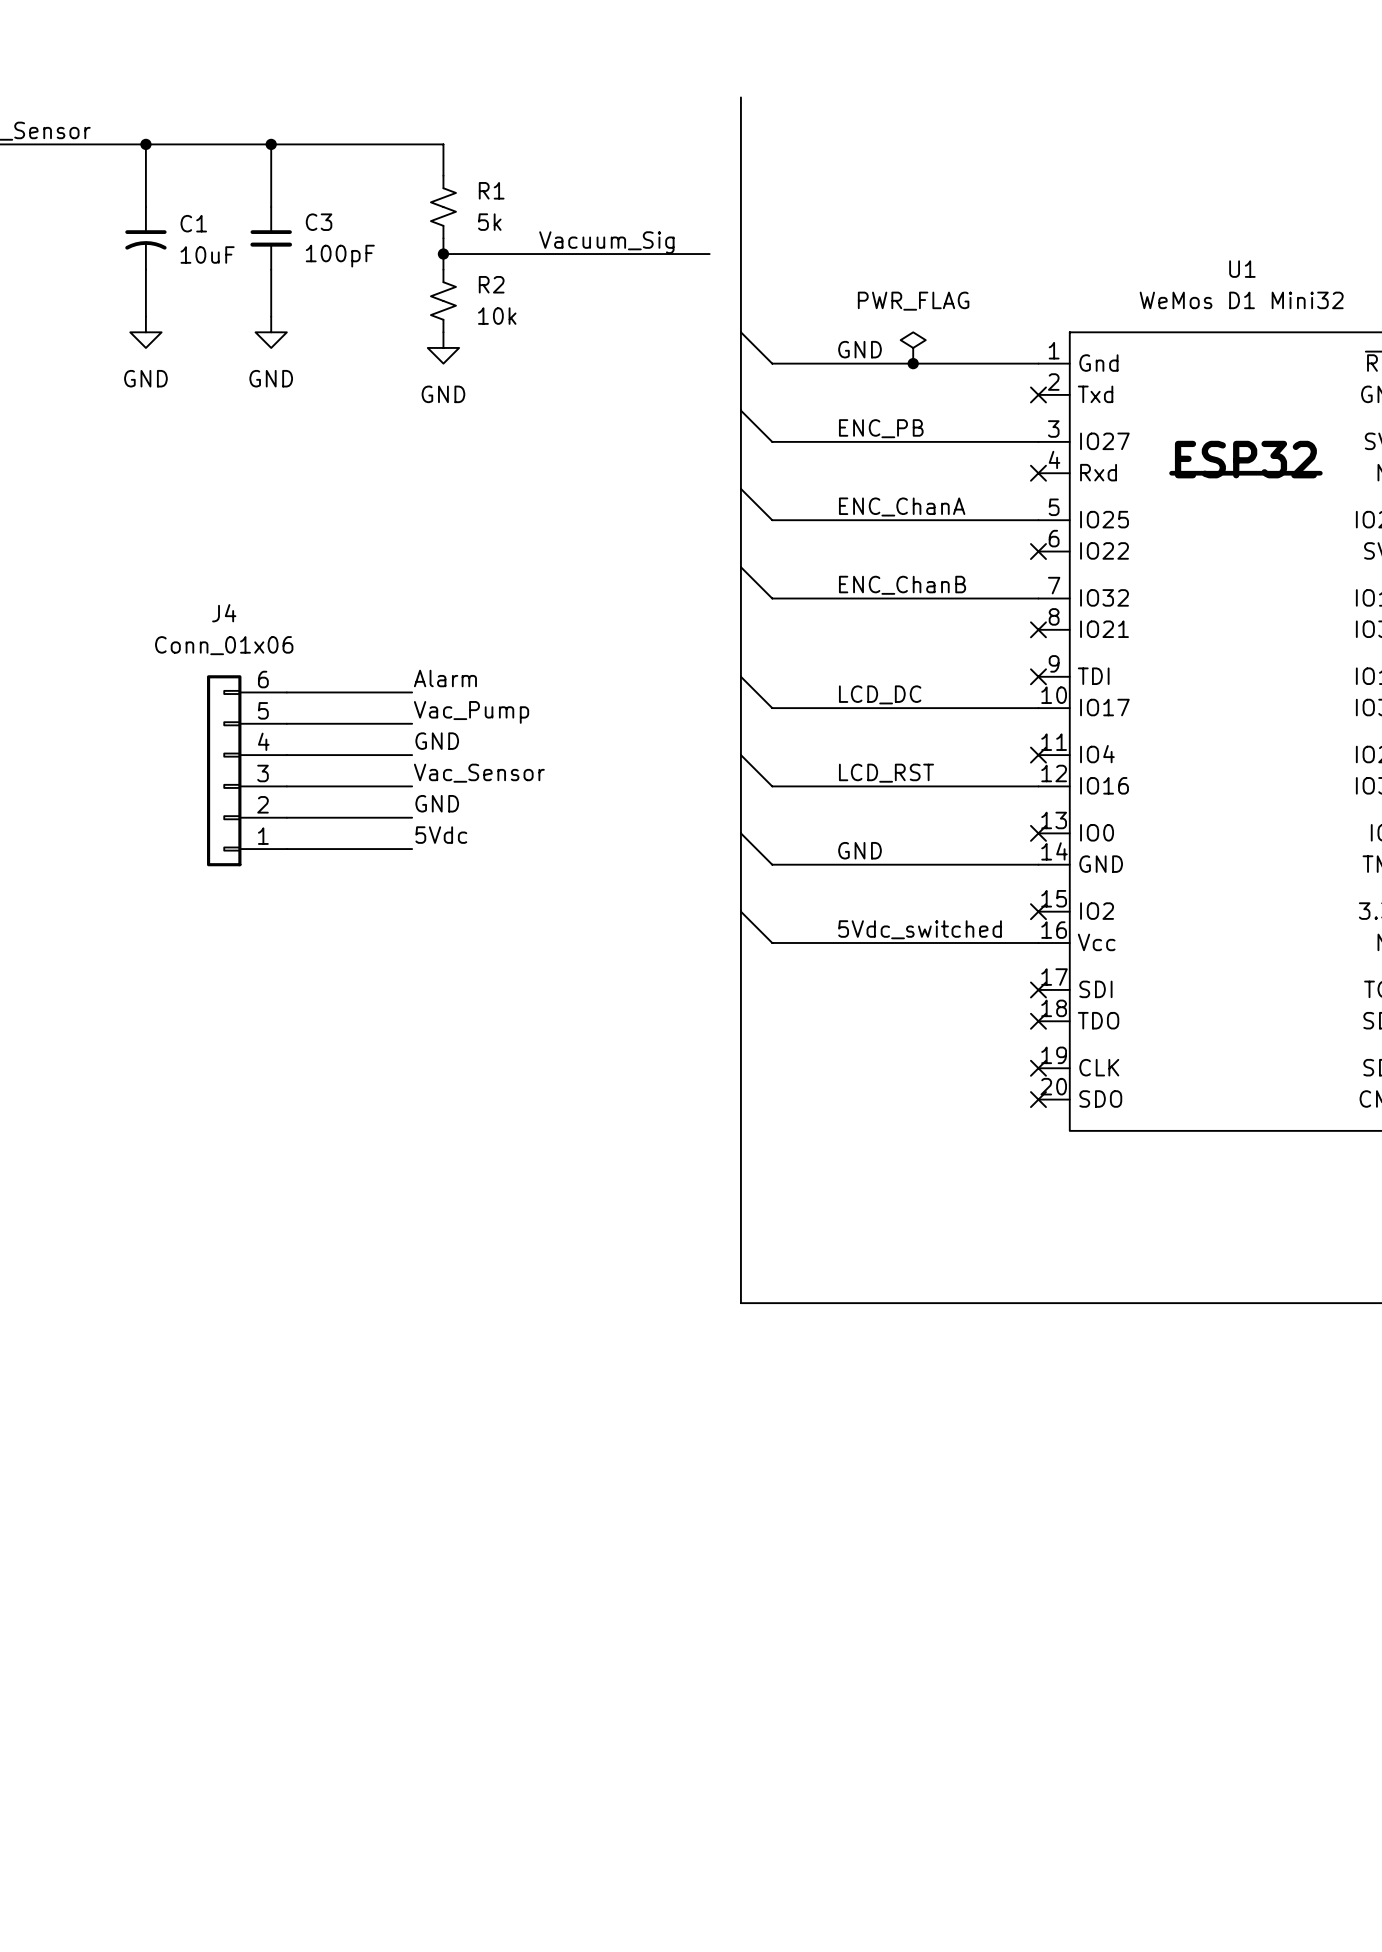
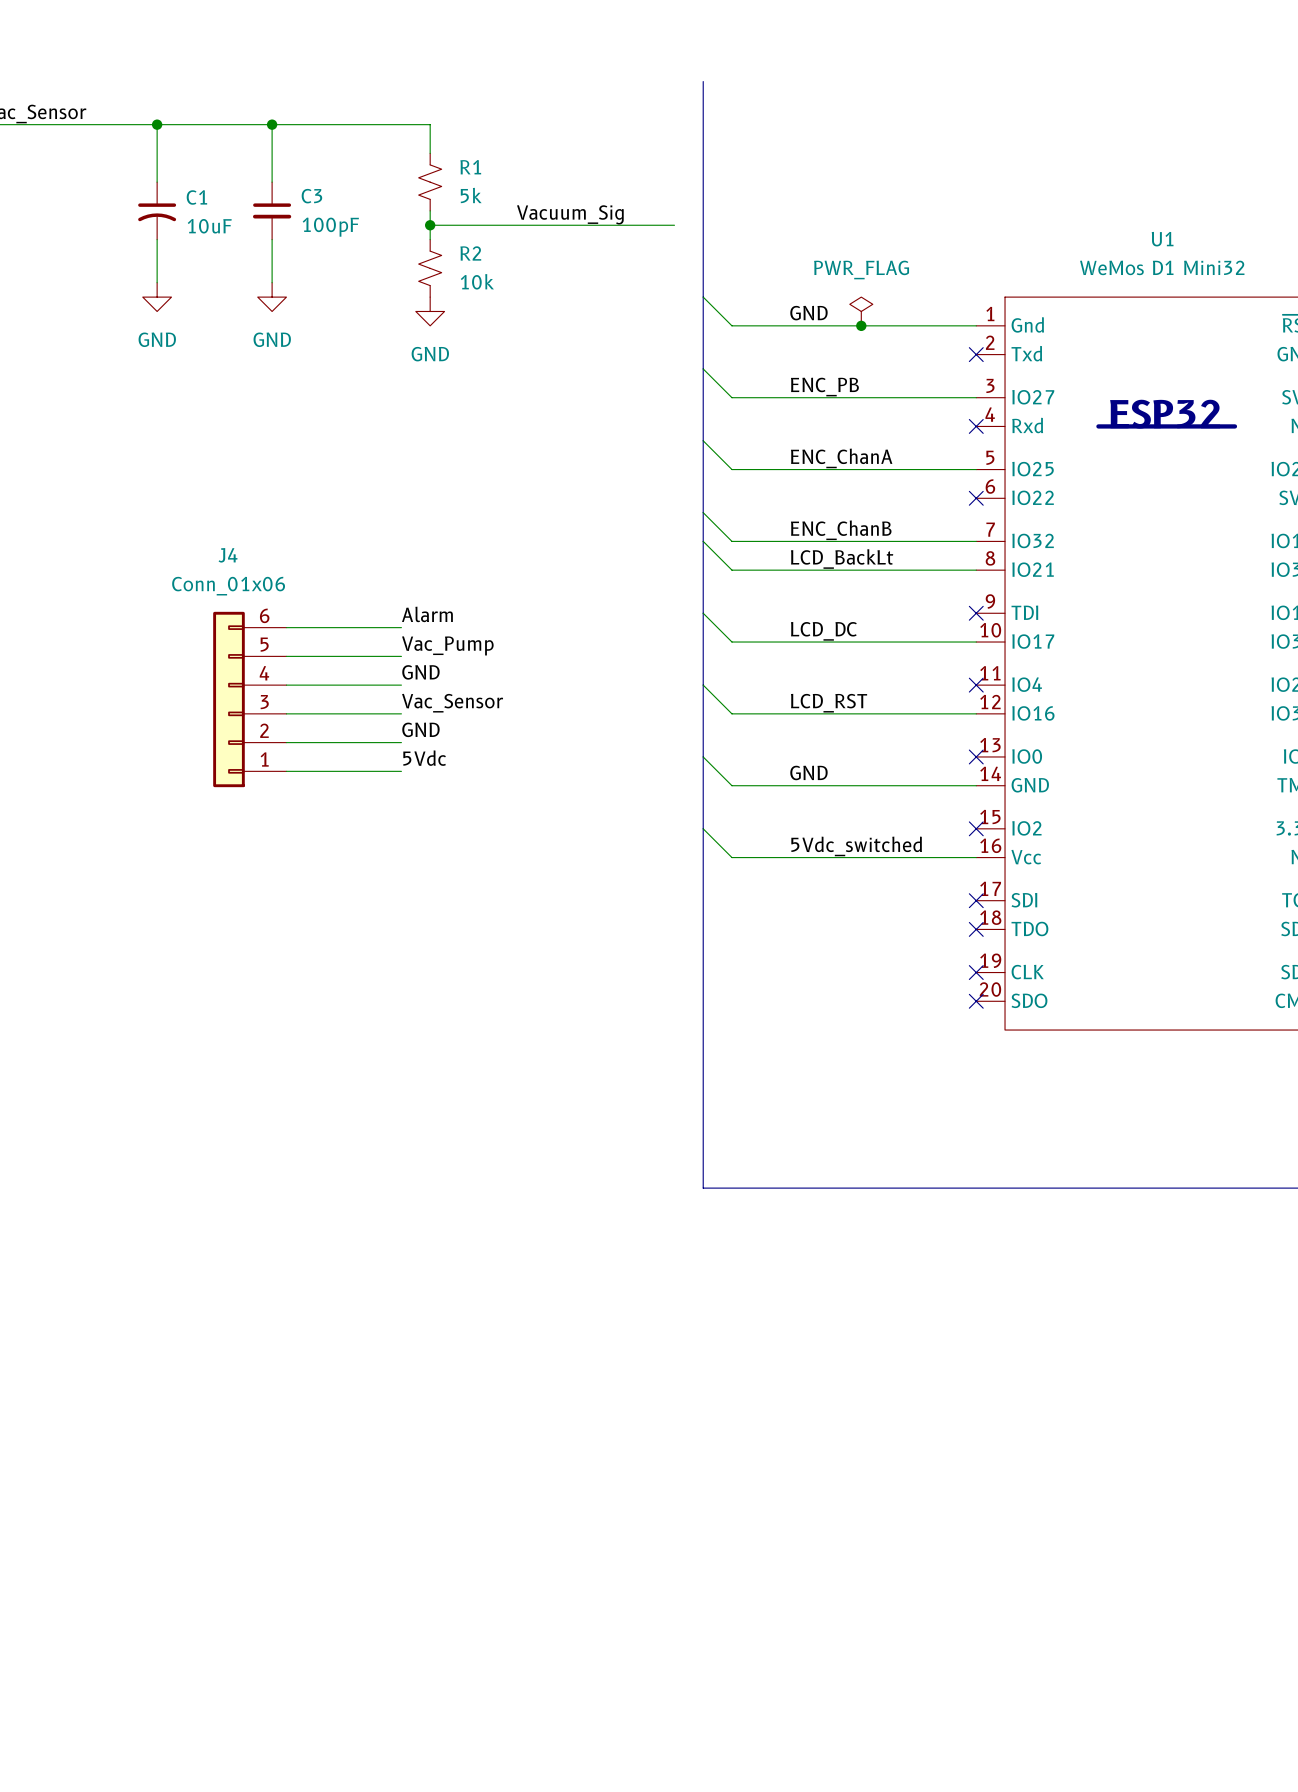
wire: none -> (703, 541) (731, 570) (976, 570)
label: none -> LCD_BackLt (842, 559)
no-connect mark: (1038, 629) -> none

